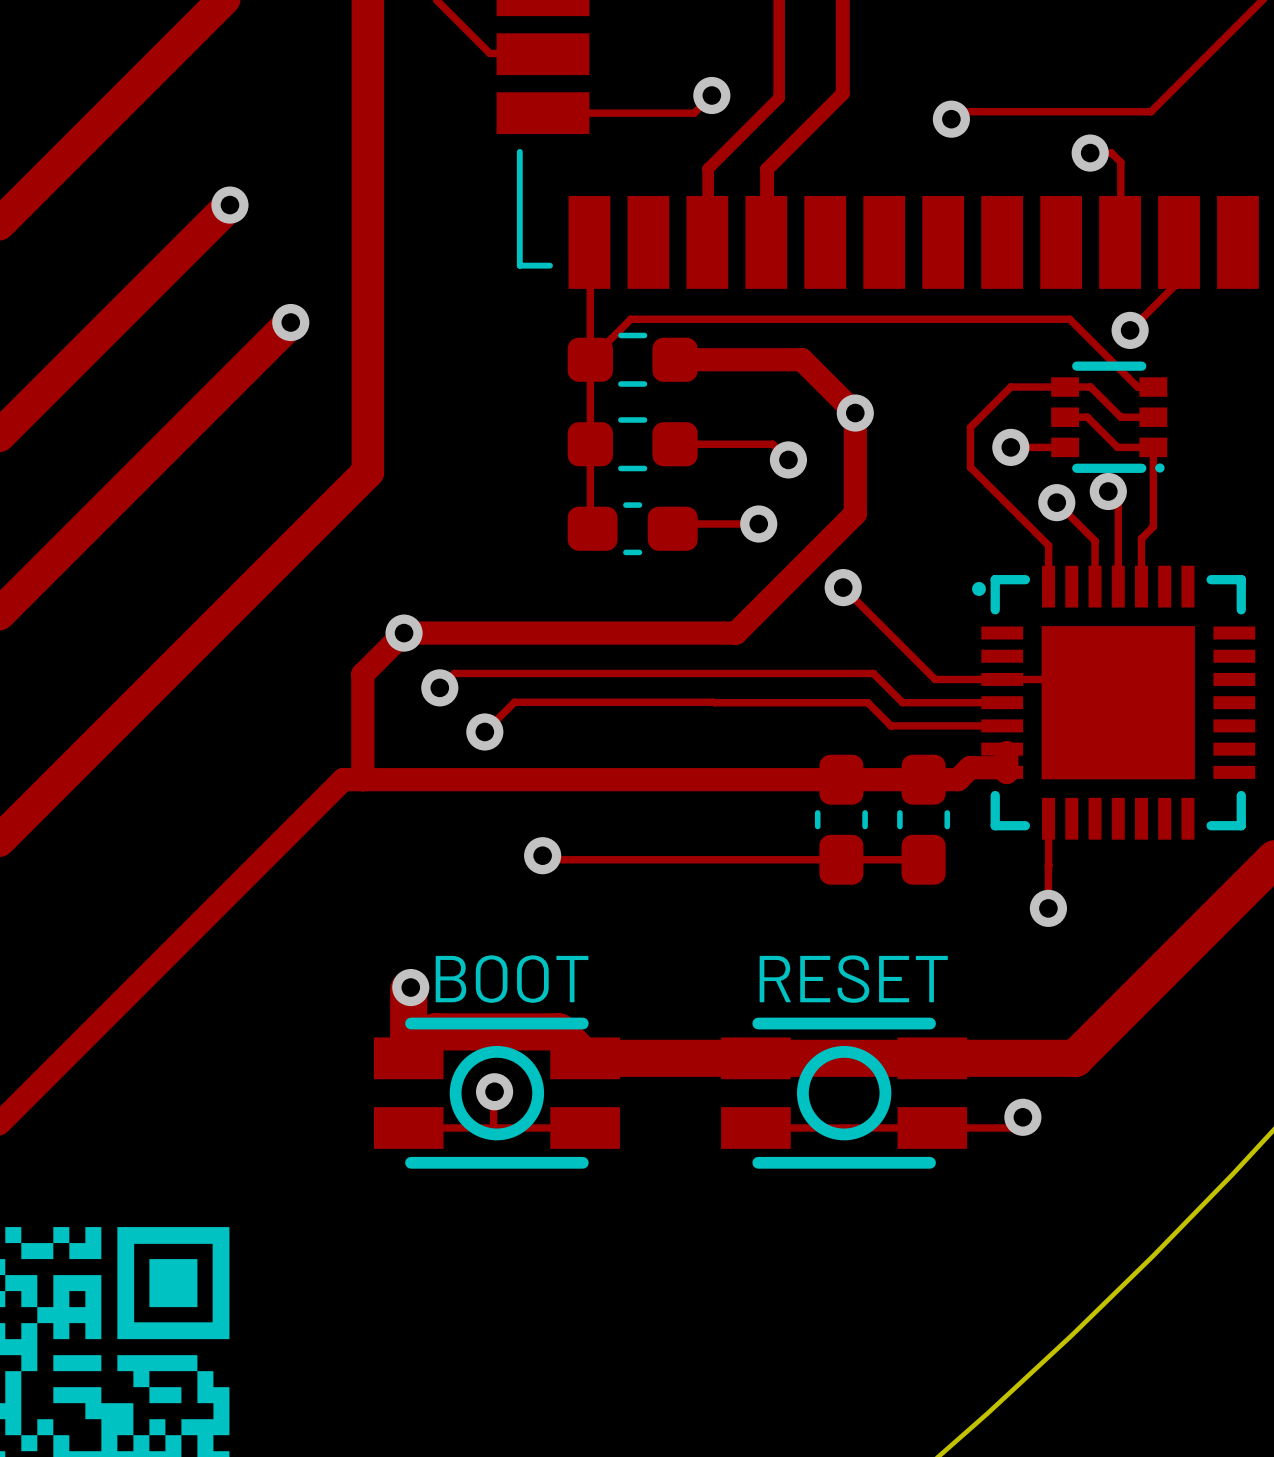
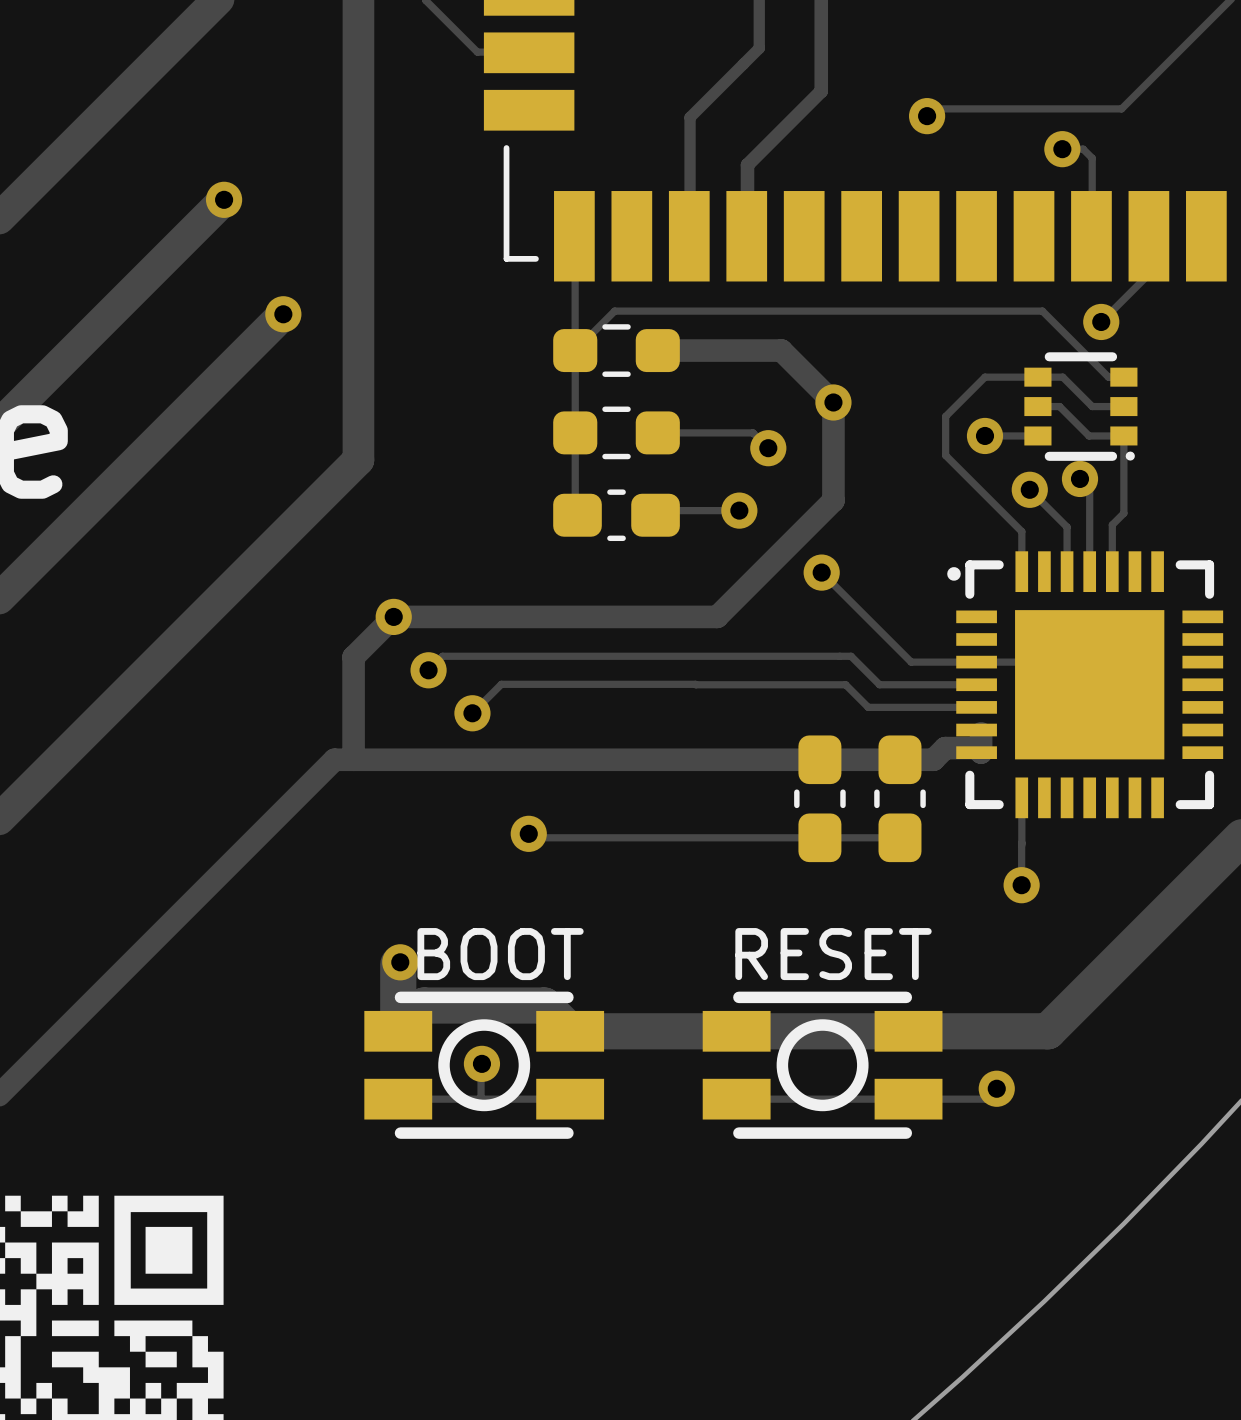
track: (779, 49) (779, 97) (708, 168) -> (759, 48) (690, 117) (690, 164)
track: (711, 95) (694, 113) (543, 113) -> none
via: (711, 95) -> none

